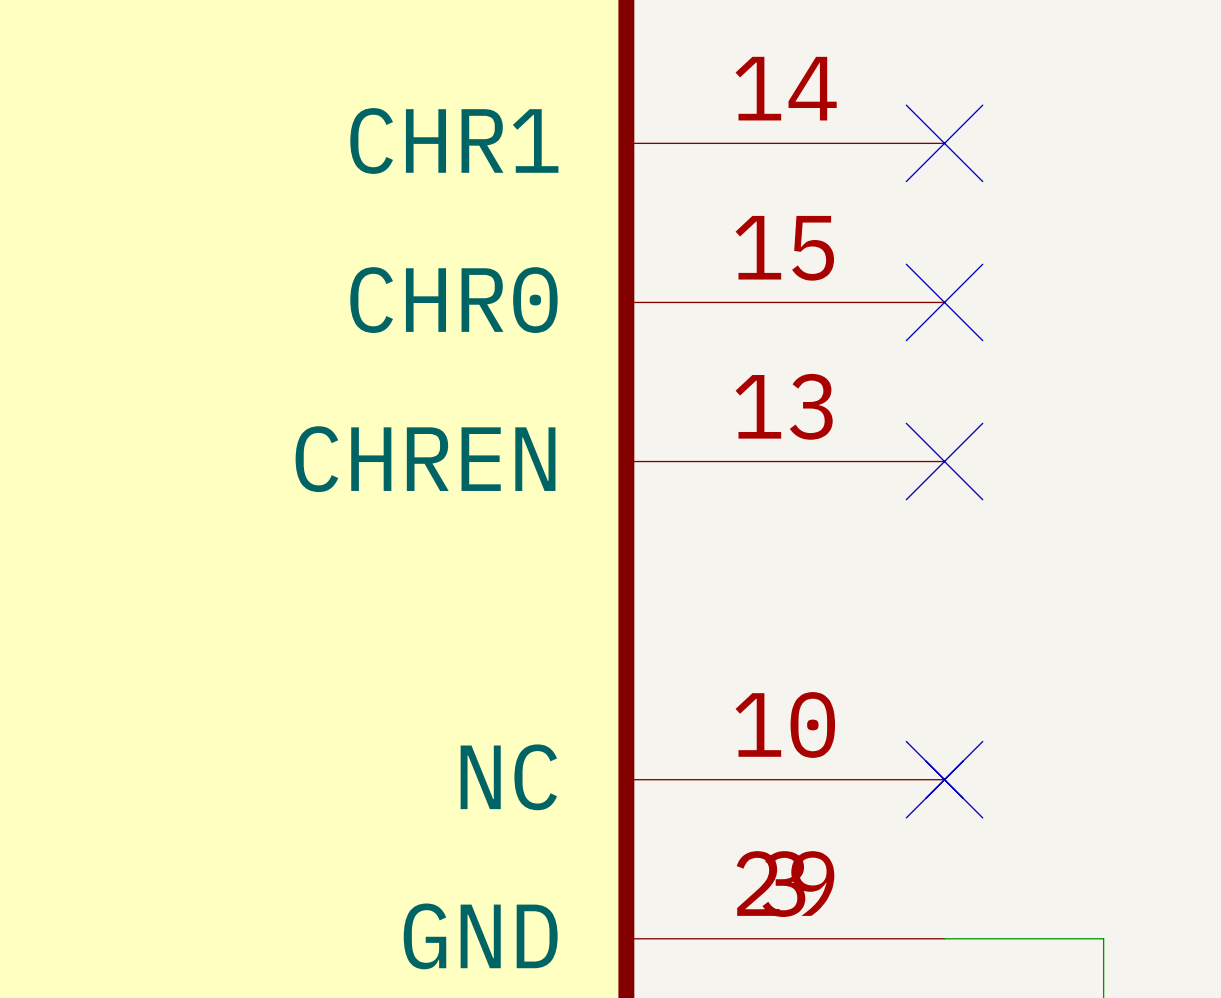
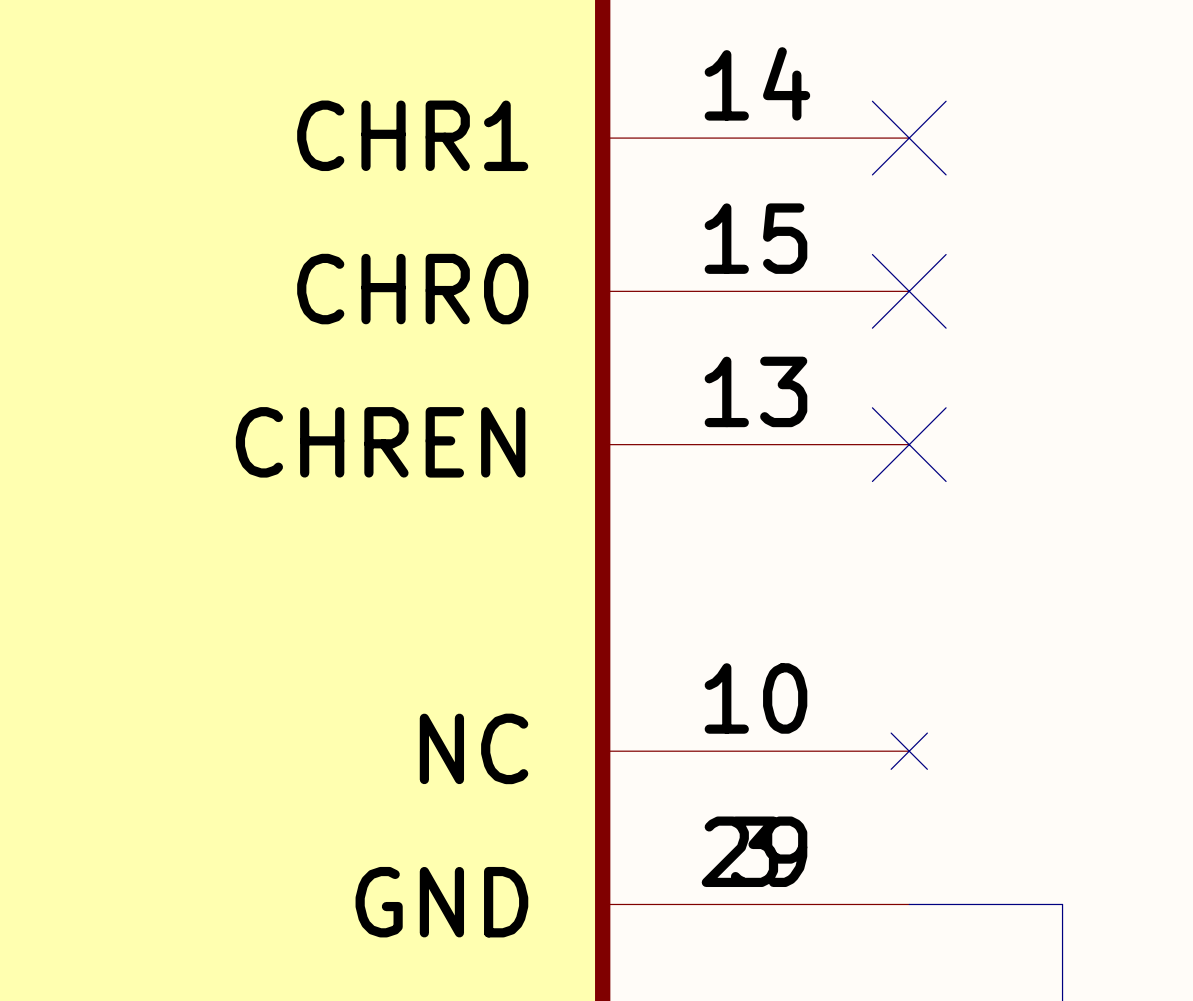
no-connect mark: (944, 779) -> none

